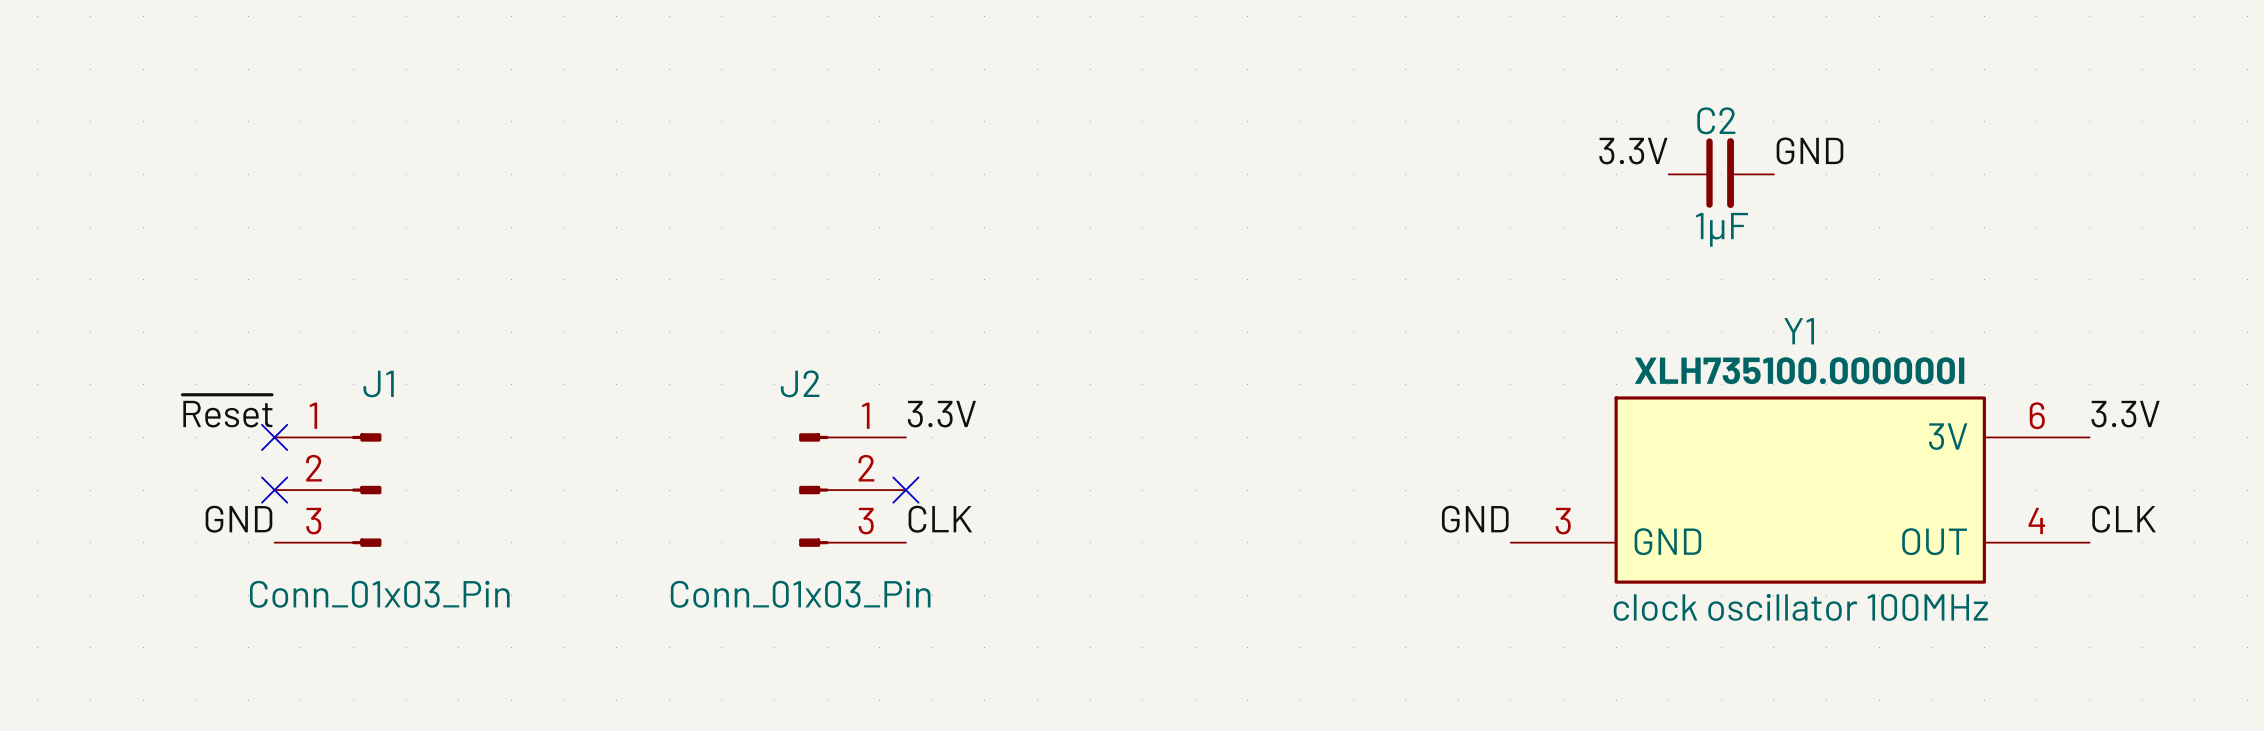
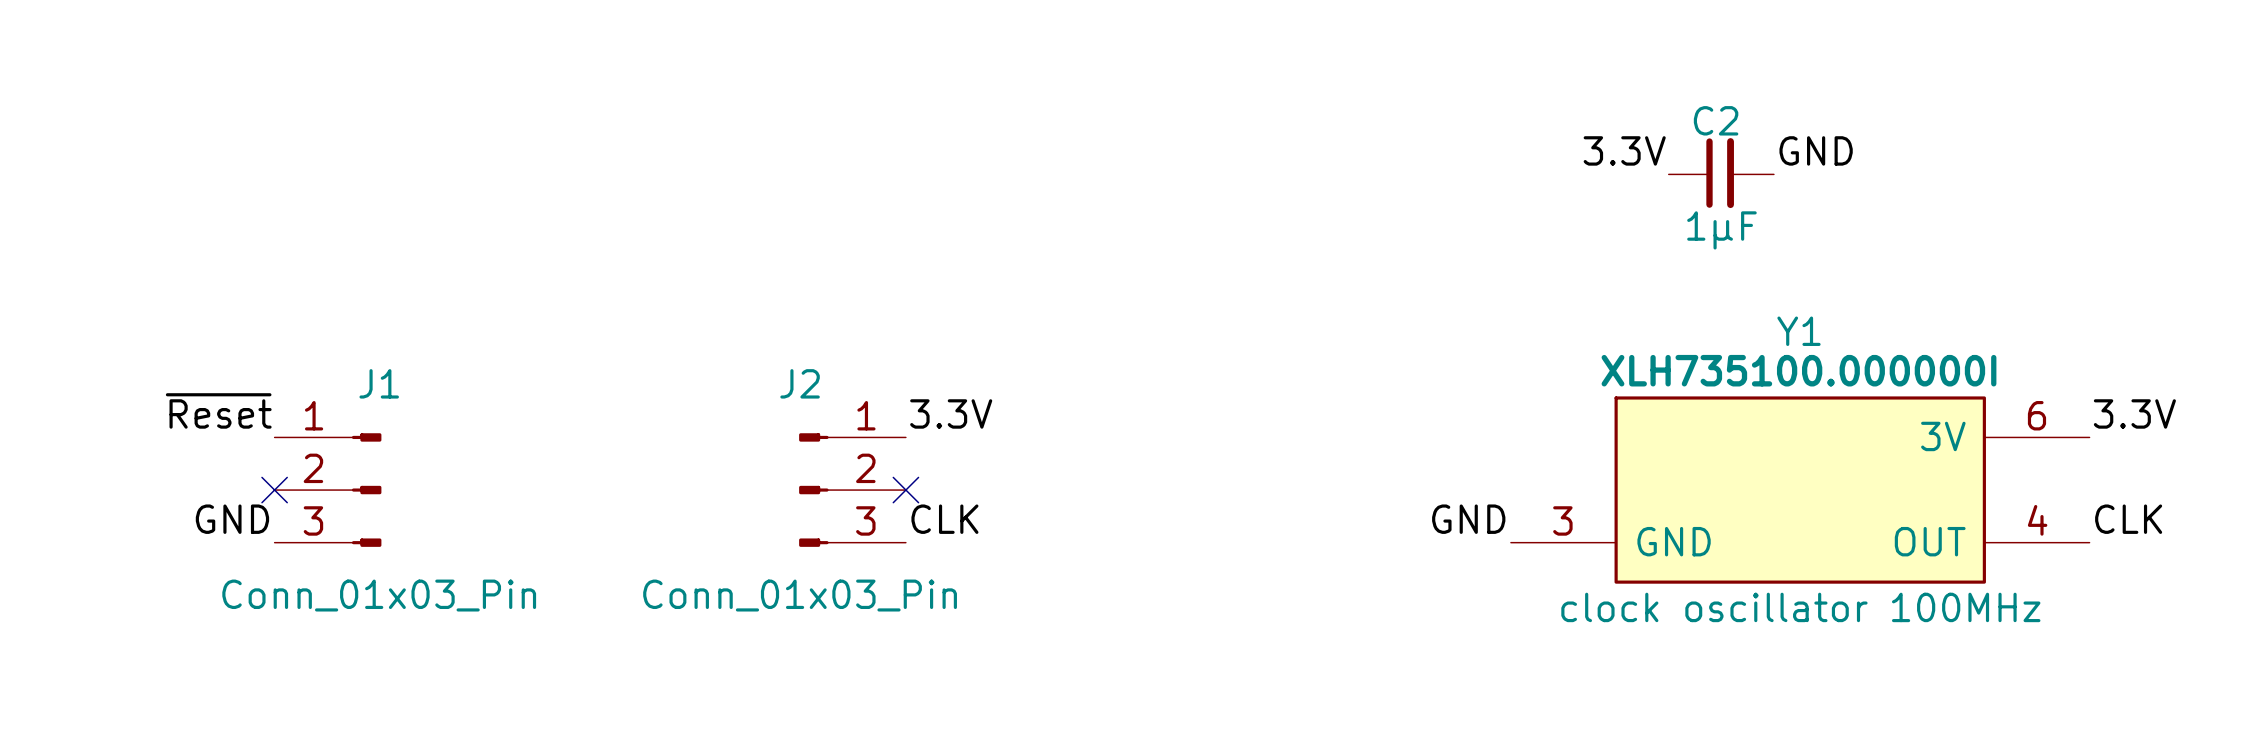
no-connect mark: (274, 437) -> none

